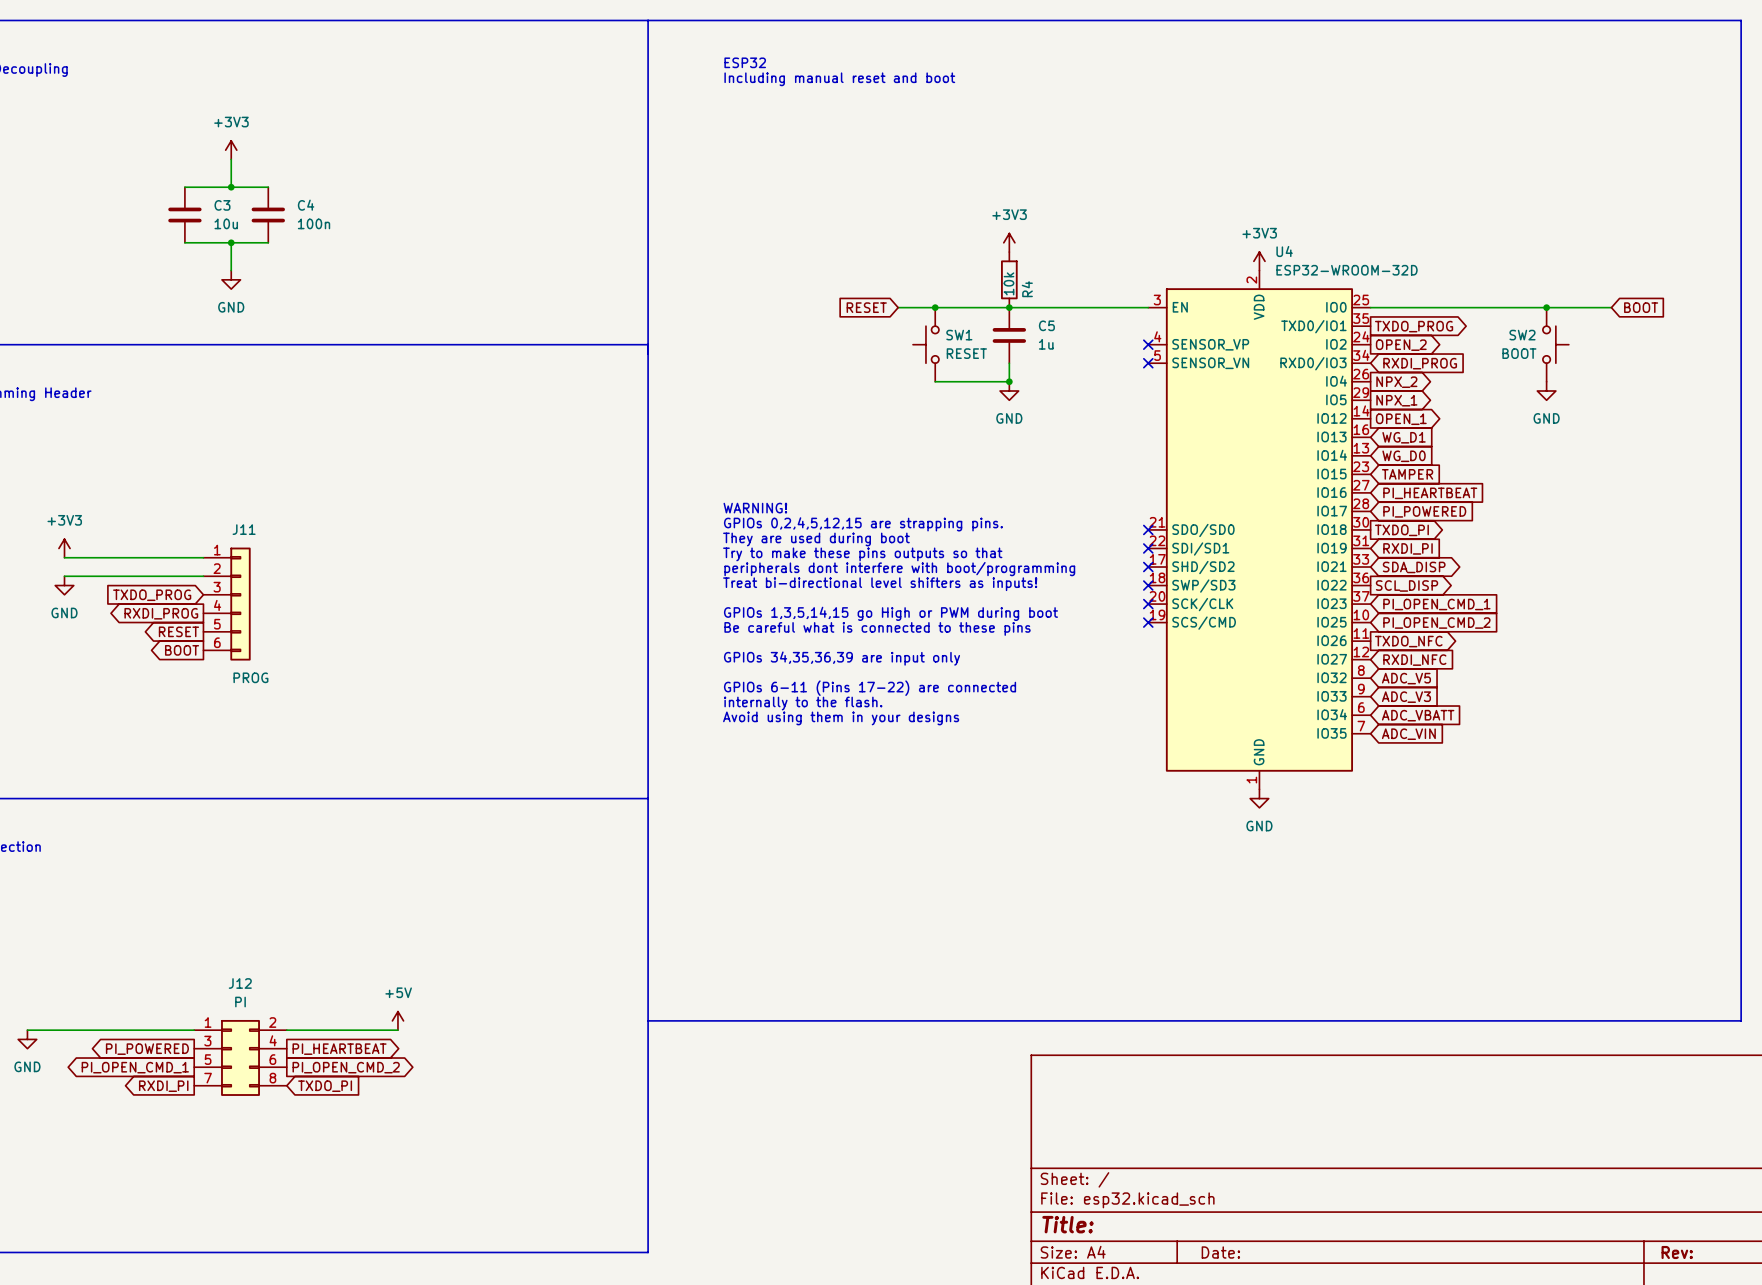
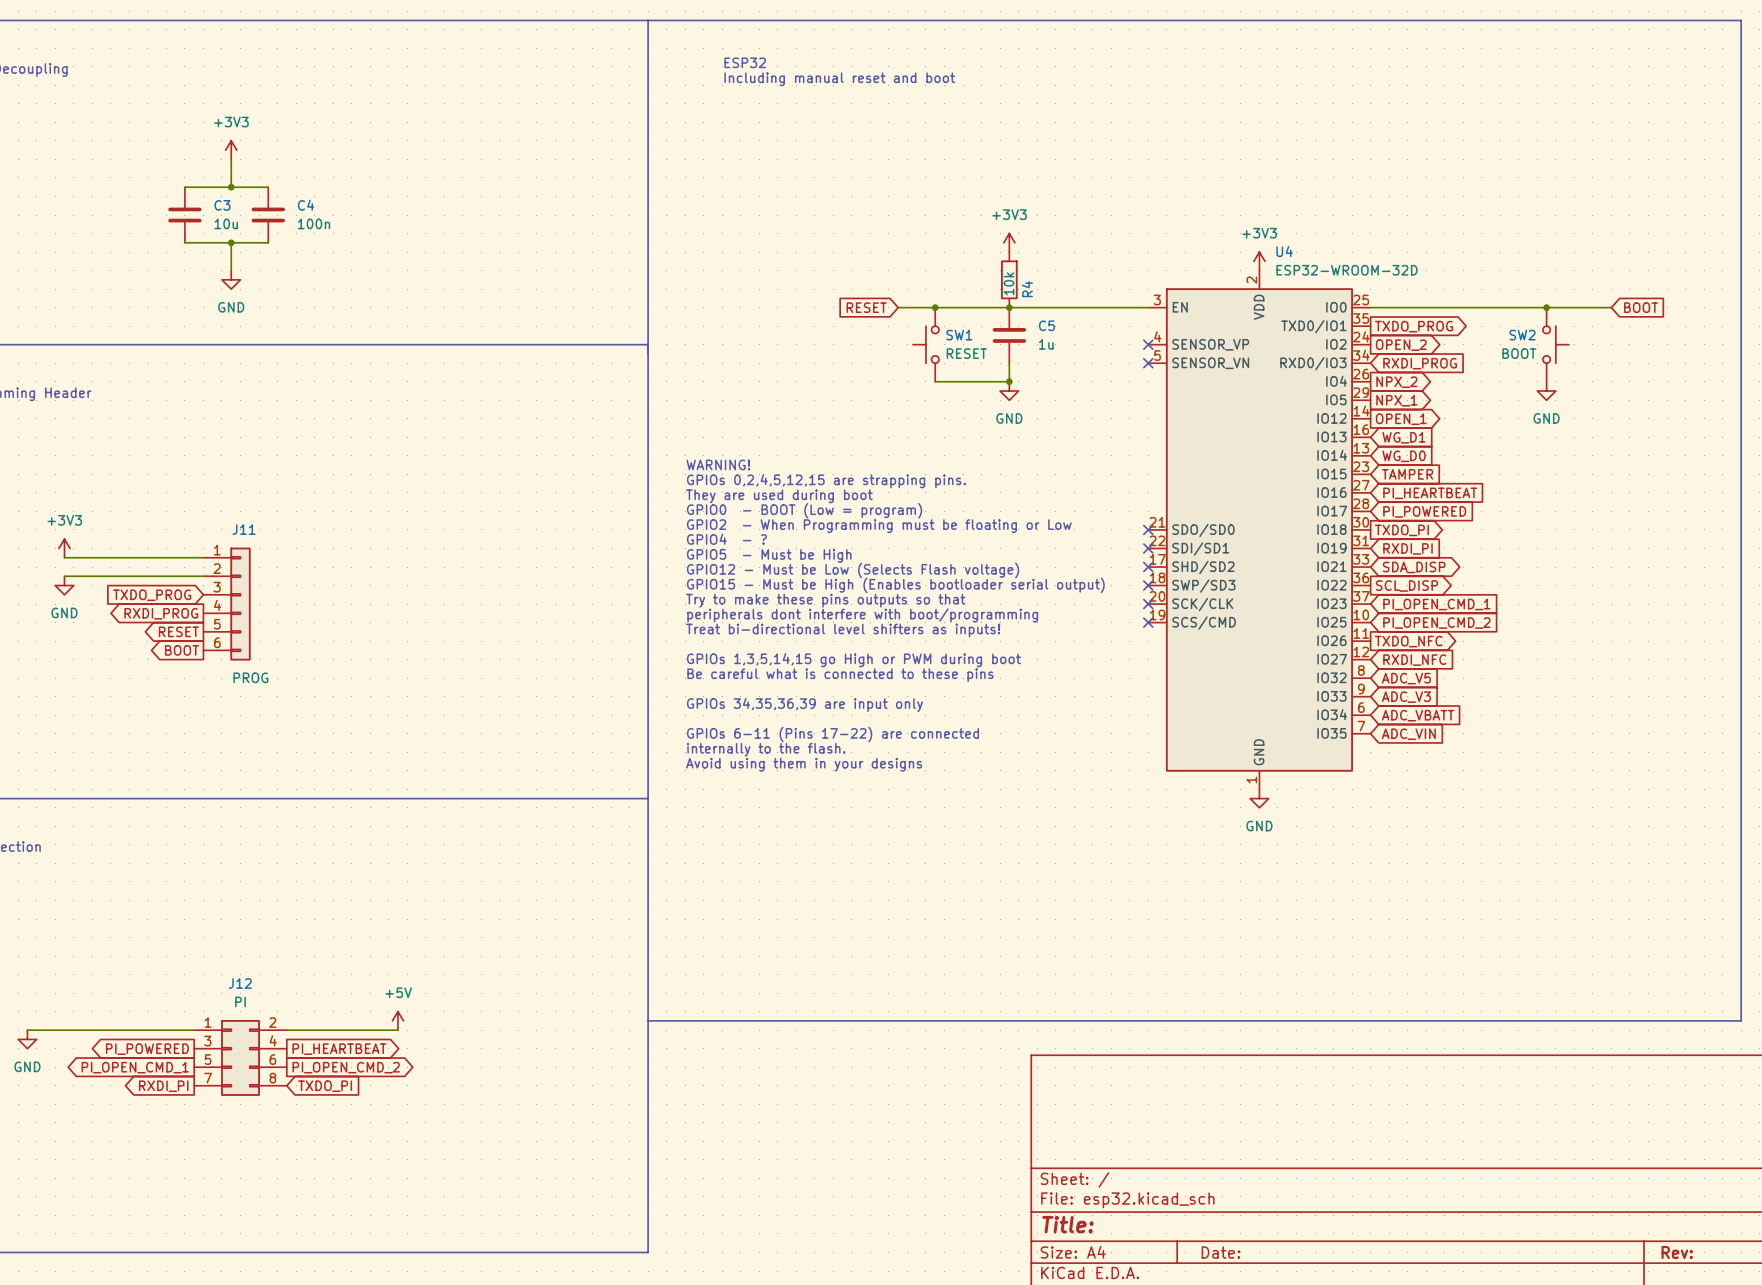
text position: WARNING! (755, 508) -> WARNING! (718, 464)
text: none -> GPIO0 - BOOT (Low = program) (804, 510)
text position: GPIOs 0,2,4,5,12,15 are strapping pins. (863, 524) -> GPIOs 0,2,4,5,12,15 are strapping pins. (826, 481)
text: none -> GPIO2 - When Programming must be floating or Low (879, 526)
text: none -> GPIO4 - ? (726, 539)
text position: They are used during boot (816, 539) -> They are used during boot (779, 496)
text position: Try to make these pins outputs so that (862, 554) -> Try to make these pins outputs so that (825, 600)
text: none -> GPIO5 - Must be High (769, 555)
text position: peripherals dont interfere with boot/programming (899, 569) -> peripherals dont interfere with boot/programming (862, 615)
text: none -> GPIO12 - Must be Low (Selects Flash voltage) (853, 570)
text position: Treat bi-directional level shifters as inputs! (880, 584) -> Treat bi-directional level shifters as inputs! (843, 630)
text: none -> GPIO15 - Must be High (Enables bootloader serial output) (895, 585)
text position: GPIOs 1,3,5,14,15 go High or PWM during boot (890, 613) -> GPIOs 1,3,5,14,15 go High or PWM during boot (853, 660)
text position: Be careful what is connected to these pins (877, 628) -> Be careful what is connected to these pins (840, 675)
text position: GPIOs 34,35,36,39 are input only (842, 658) -> GPIOs 34,35,36,39 are input only (804, 704)
text position: GPIOs 6-11 (Pins 17-22) are connected (870, 688) -> GPIOs 6-11 (Pins 17-22) are connected (832, 734)
text position: internally to the flash. (803, 703) -> internally to the flash. (766, 749)
text position: Avoid using them in your designs (841, 718) -> Avoid using them in your designs (804, 764)

